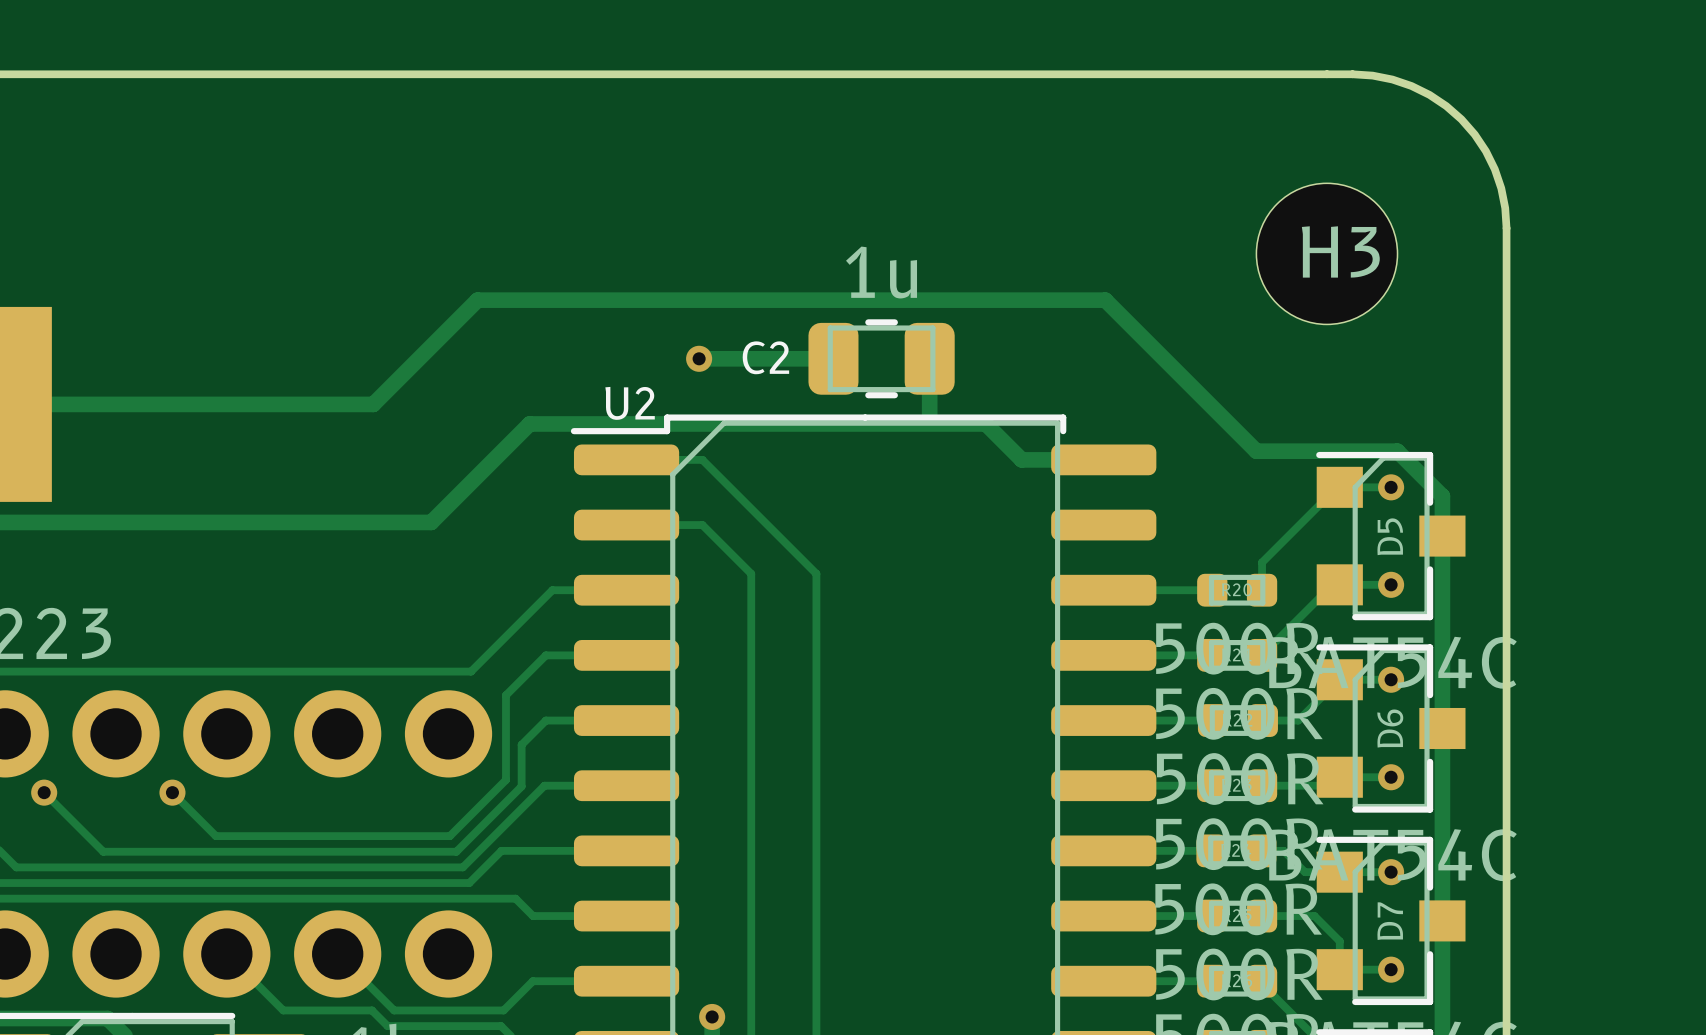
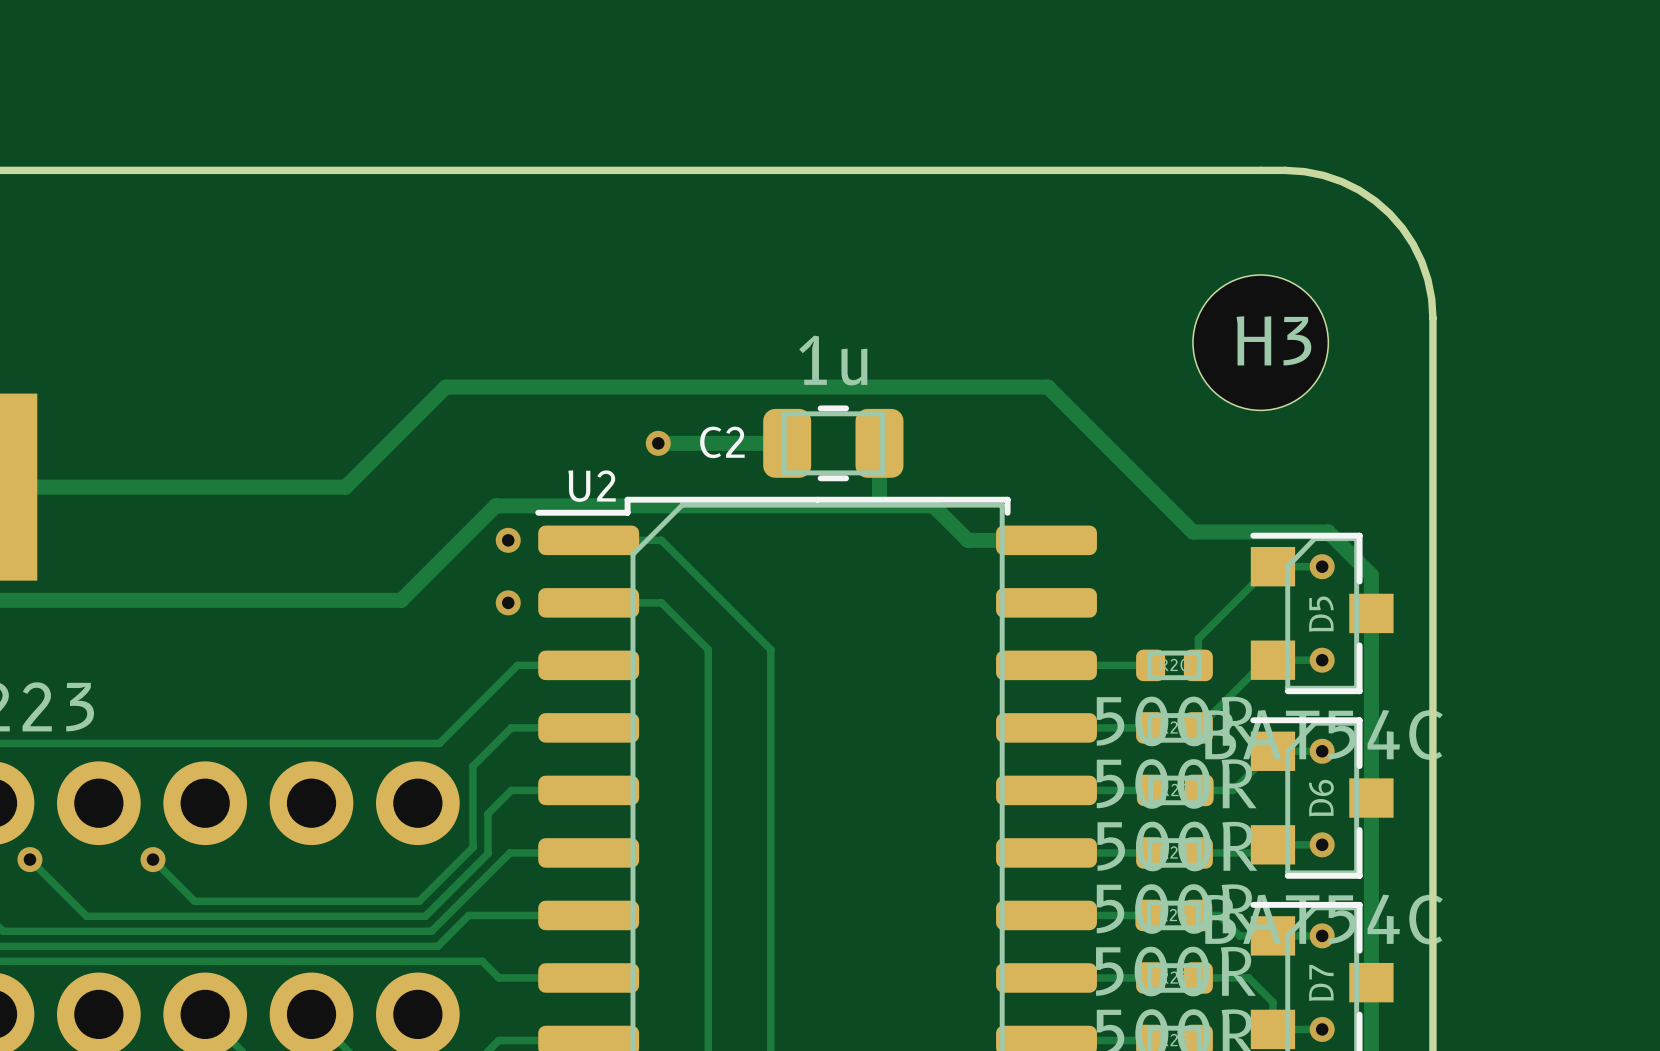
via: none -> (508, 540)
via: none -> (508, 602)

